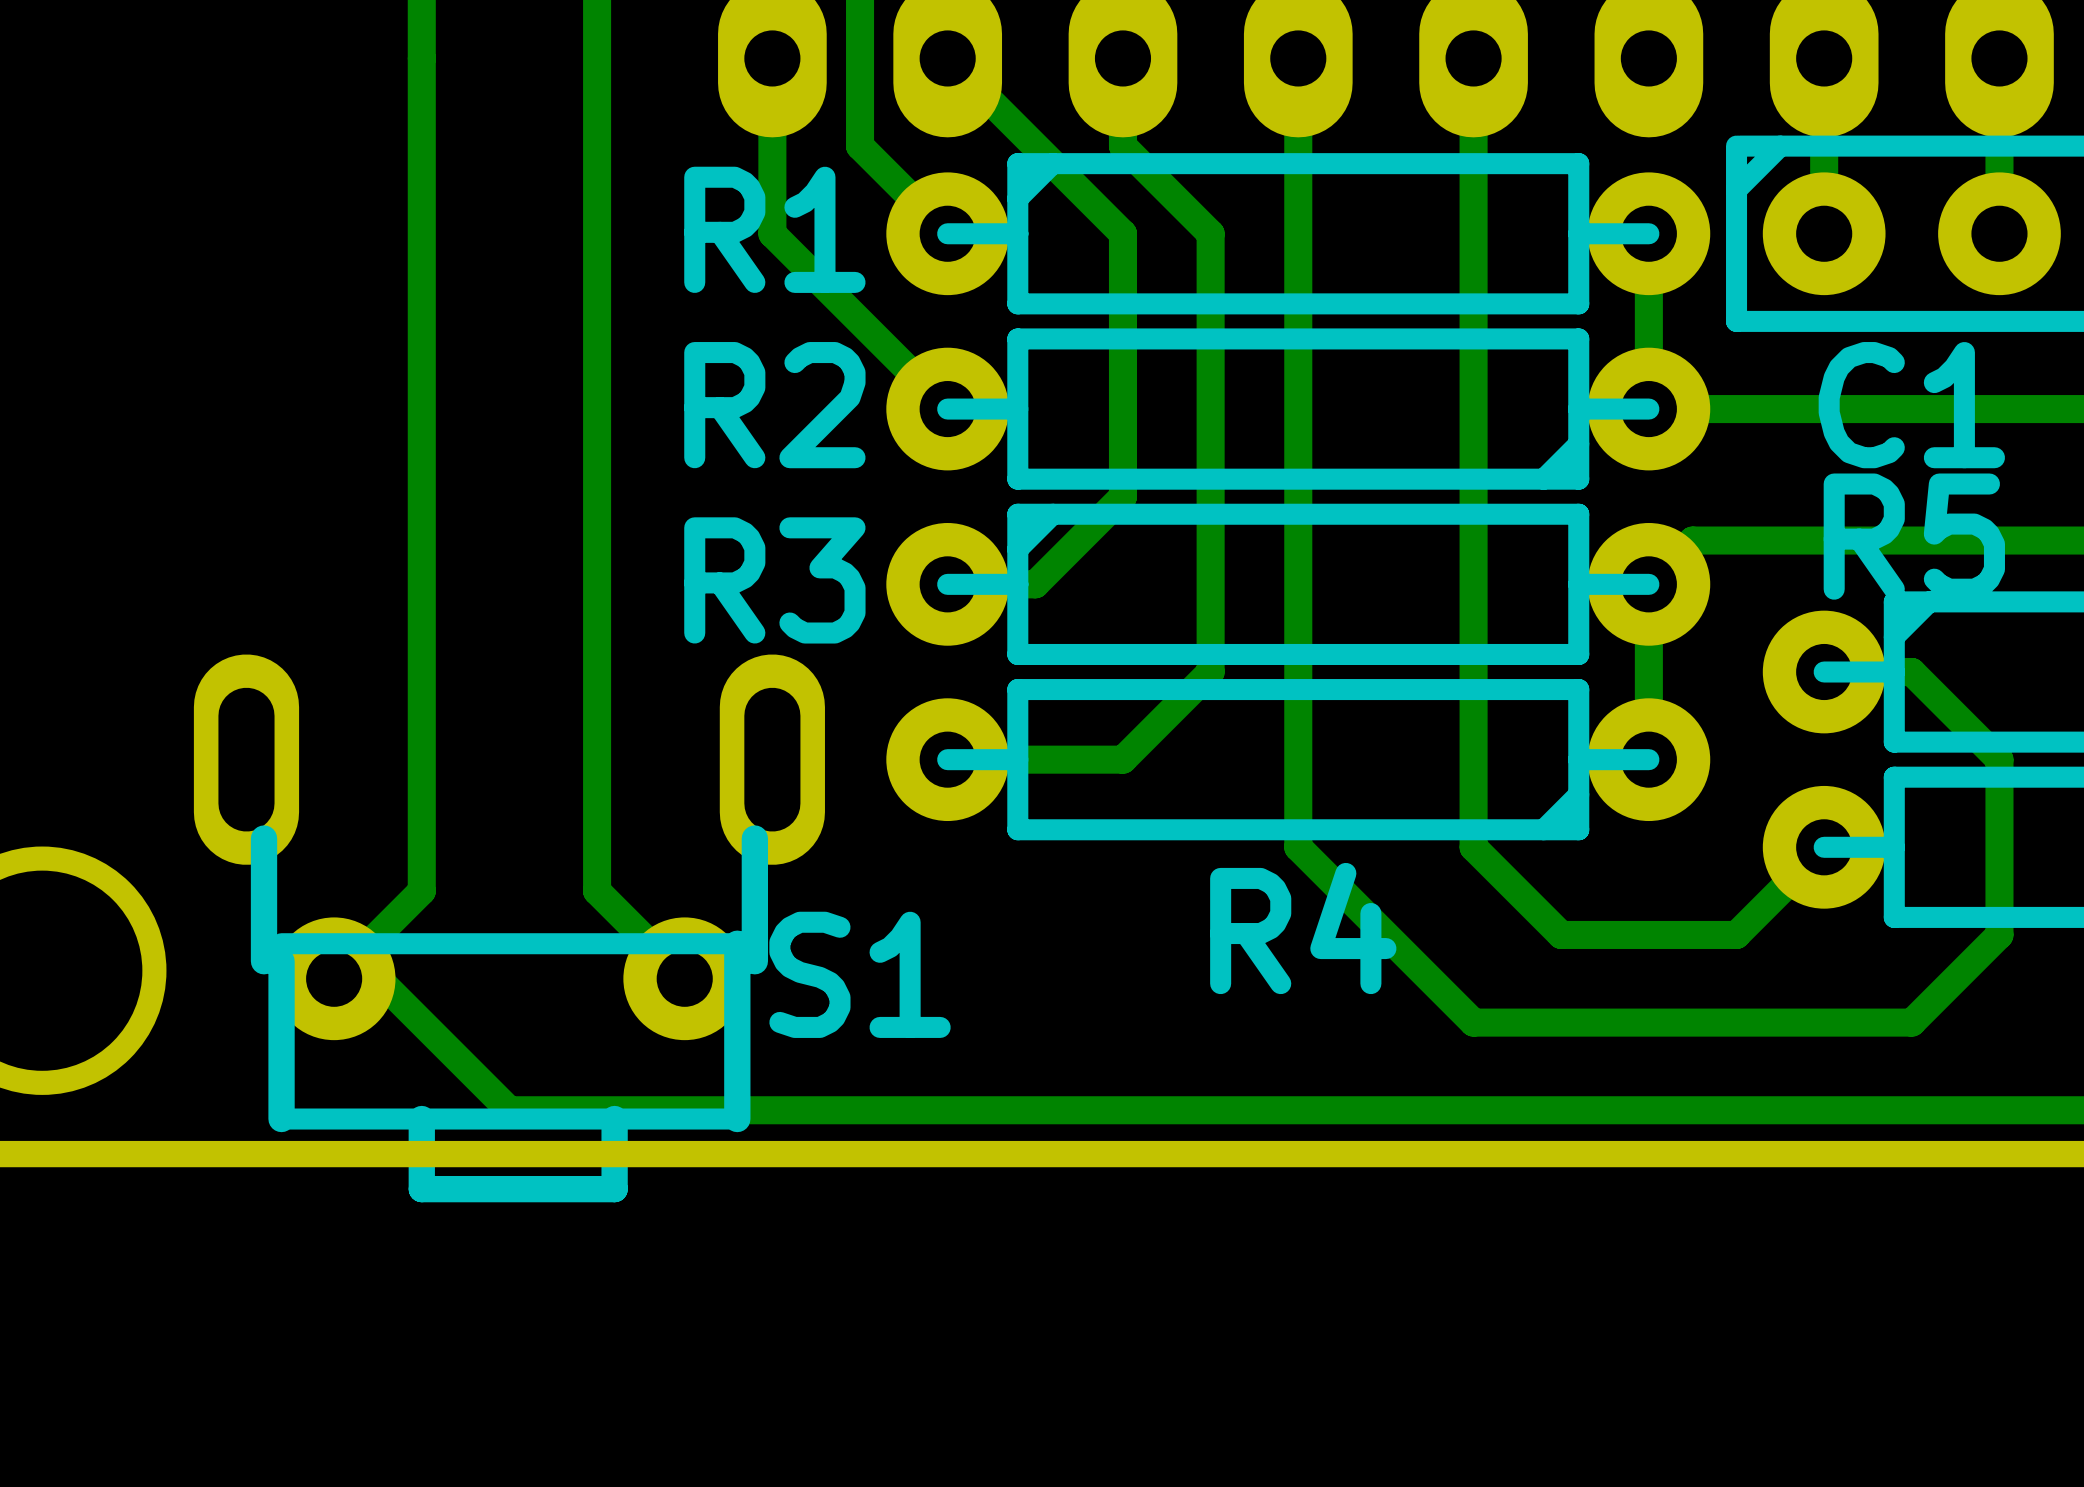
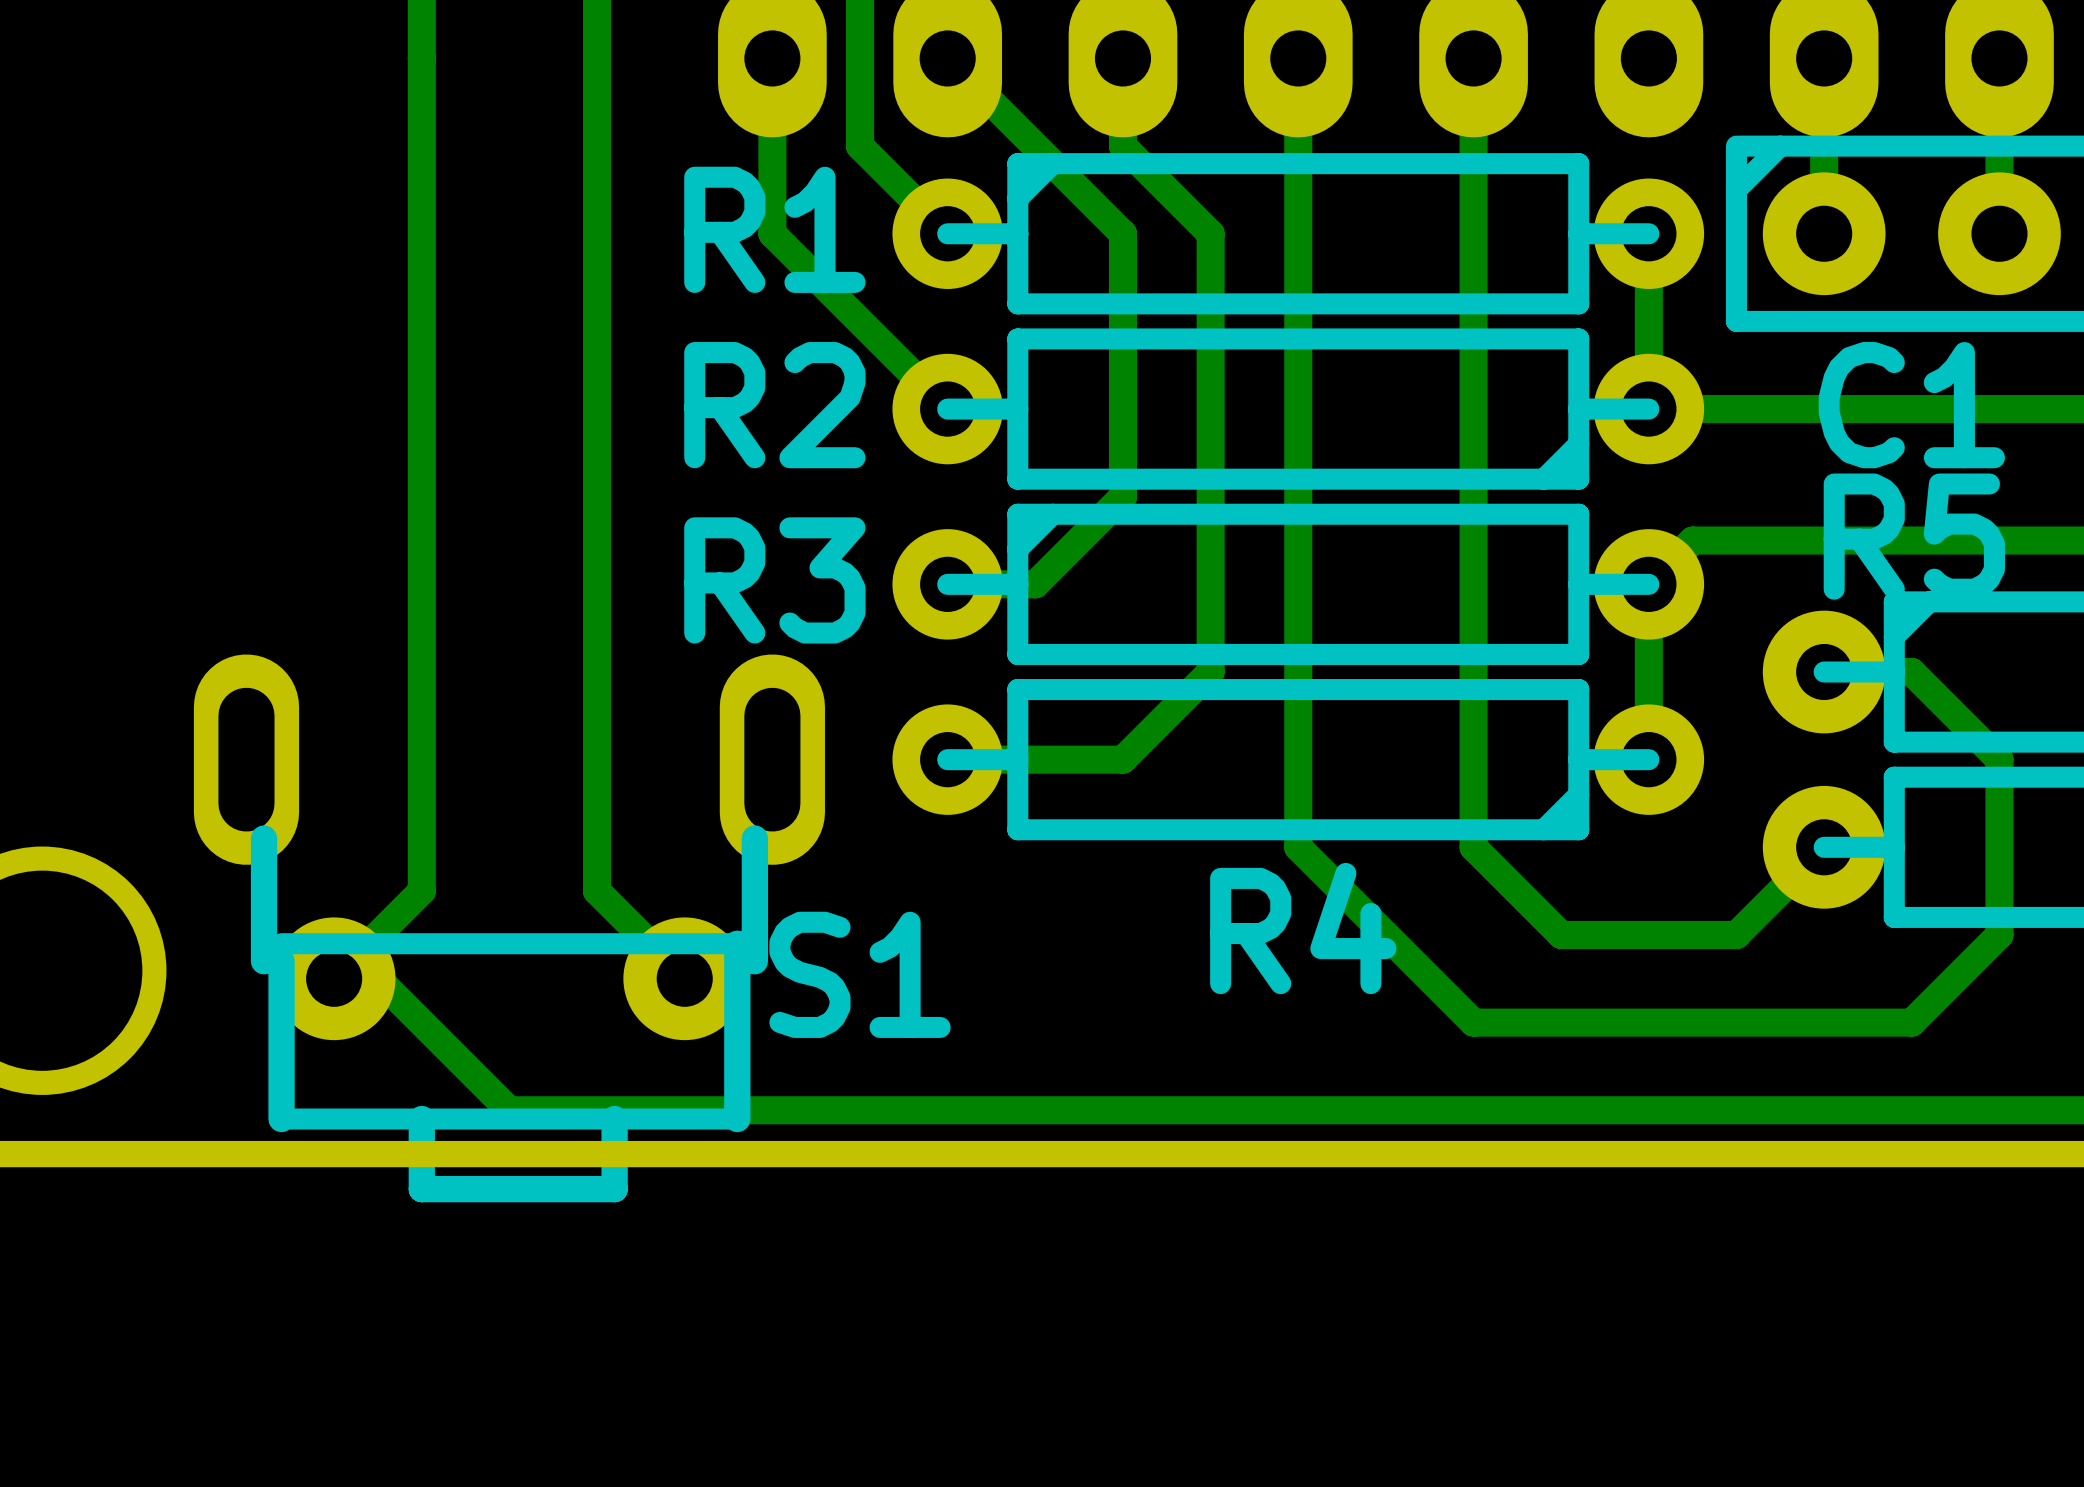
R1 footprint: [886, 153, 1711, 315] -> [892, 153, 1705, 315]
R2 footprint: [886, 328, 1711, 490] -> [892, 328, 1705, 490]
R3 footprint: [886, 503, 1711, 665] -> [892, 503, 1705, 665]
R4 footprint: [886, 679, 1711, 841] -> [892, 679, 1705, 841]

